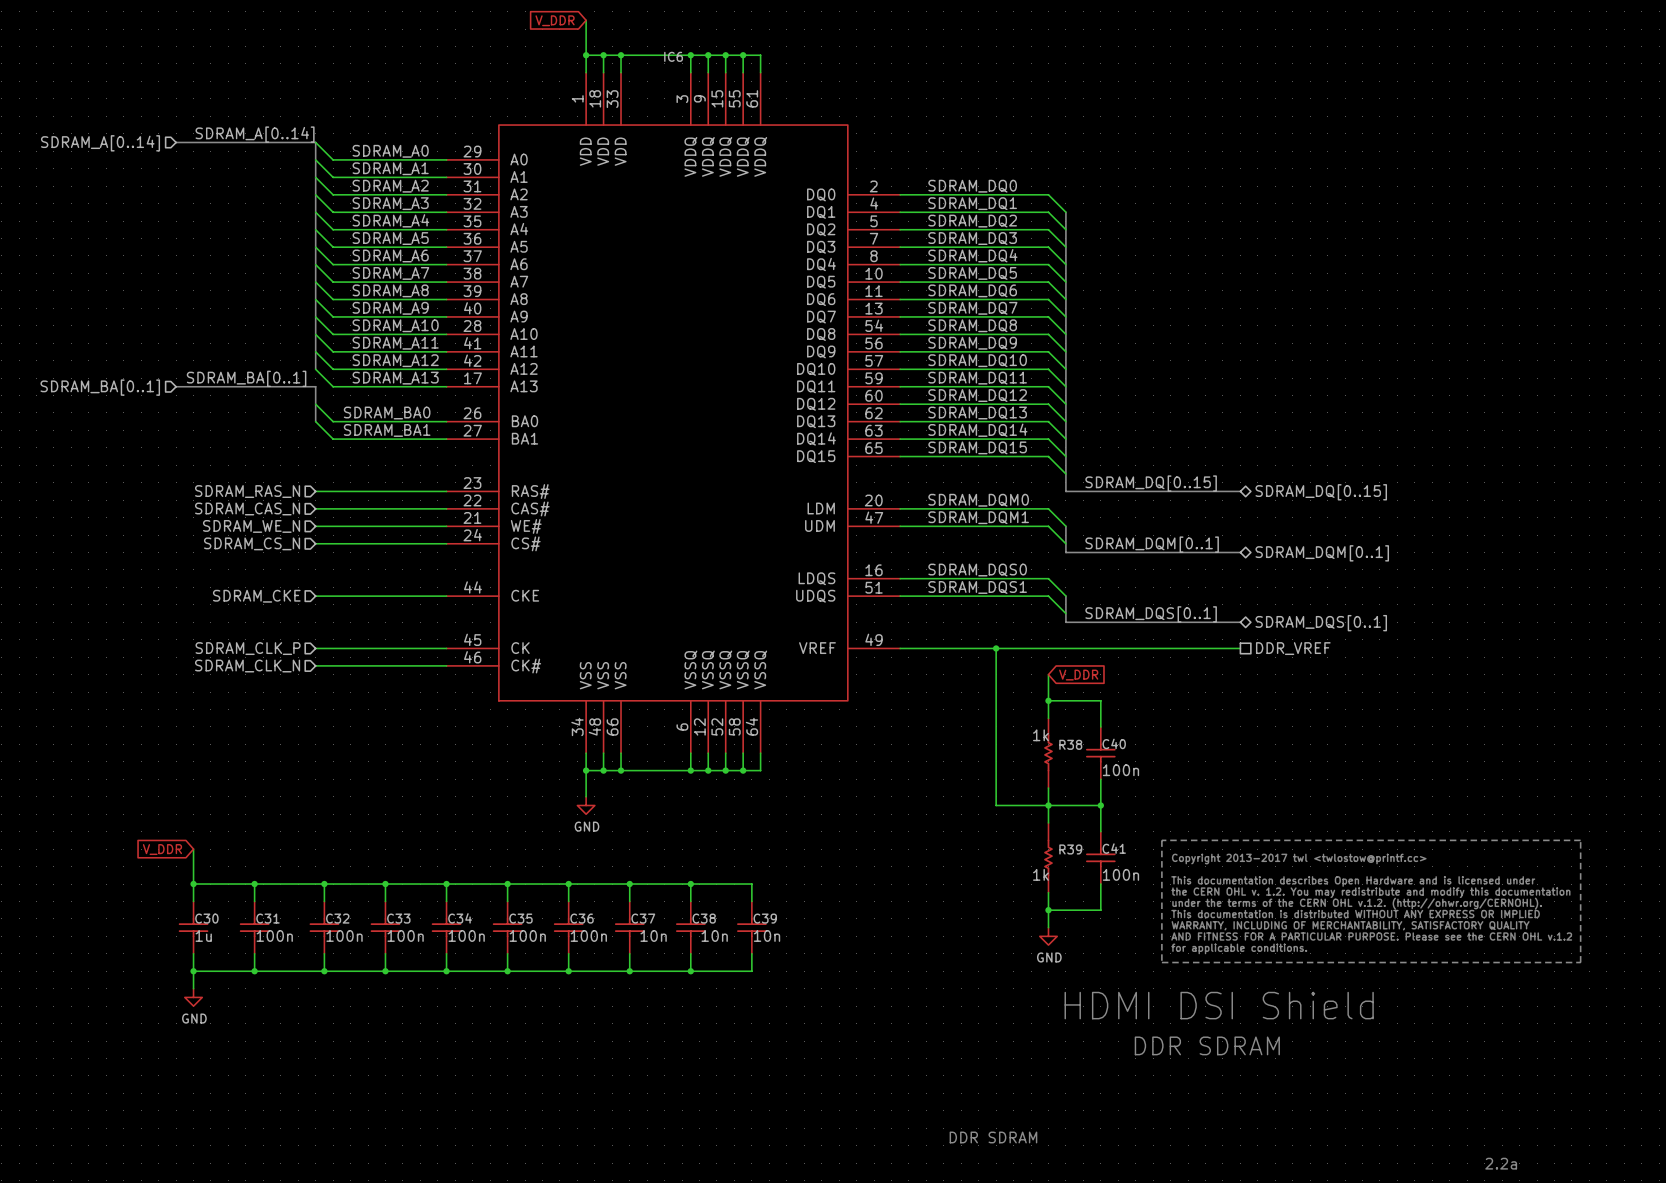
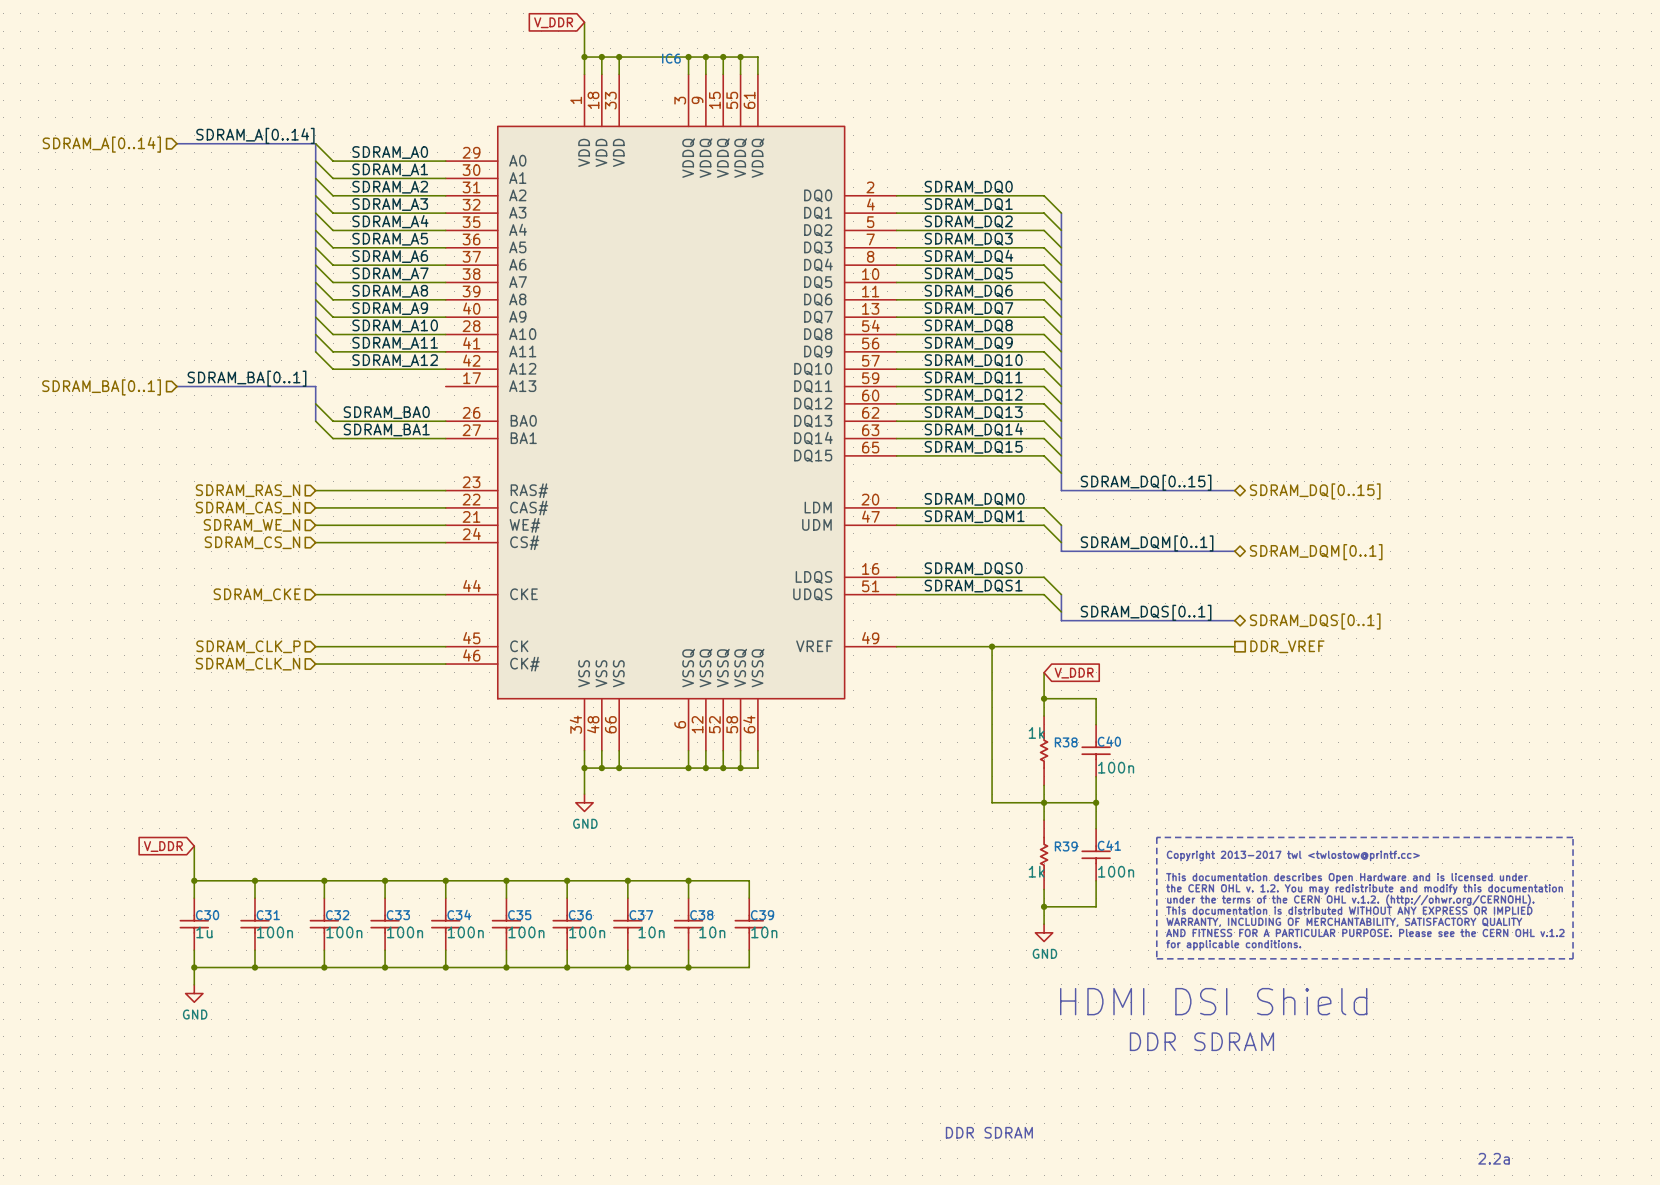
bus: (315, 351) (315, 369) -> none
wire: (315, 369) (333, 386) (446, 386) -> none
label: SDRAM_A13 (395, 378) -> none

